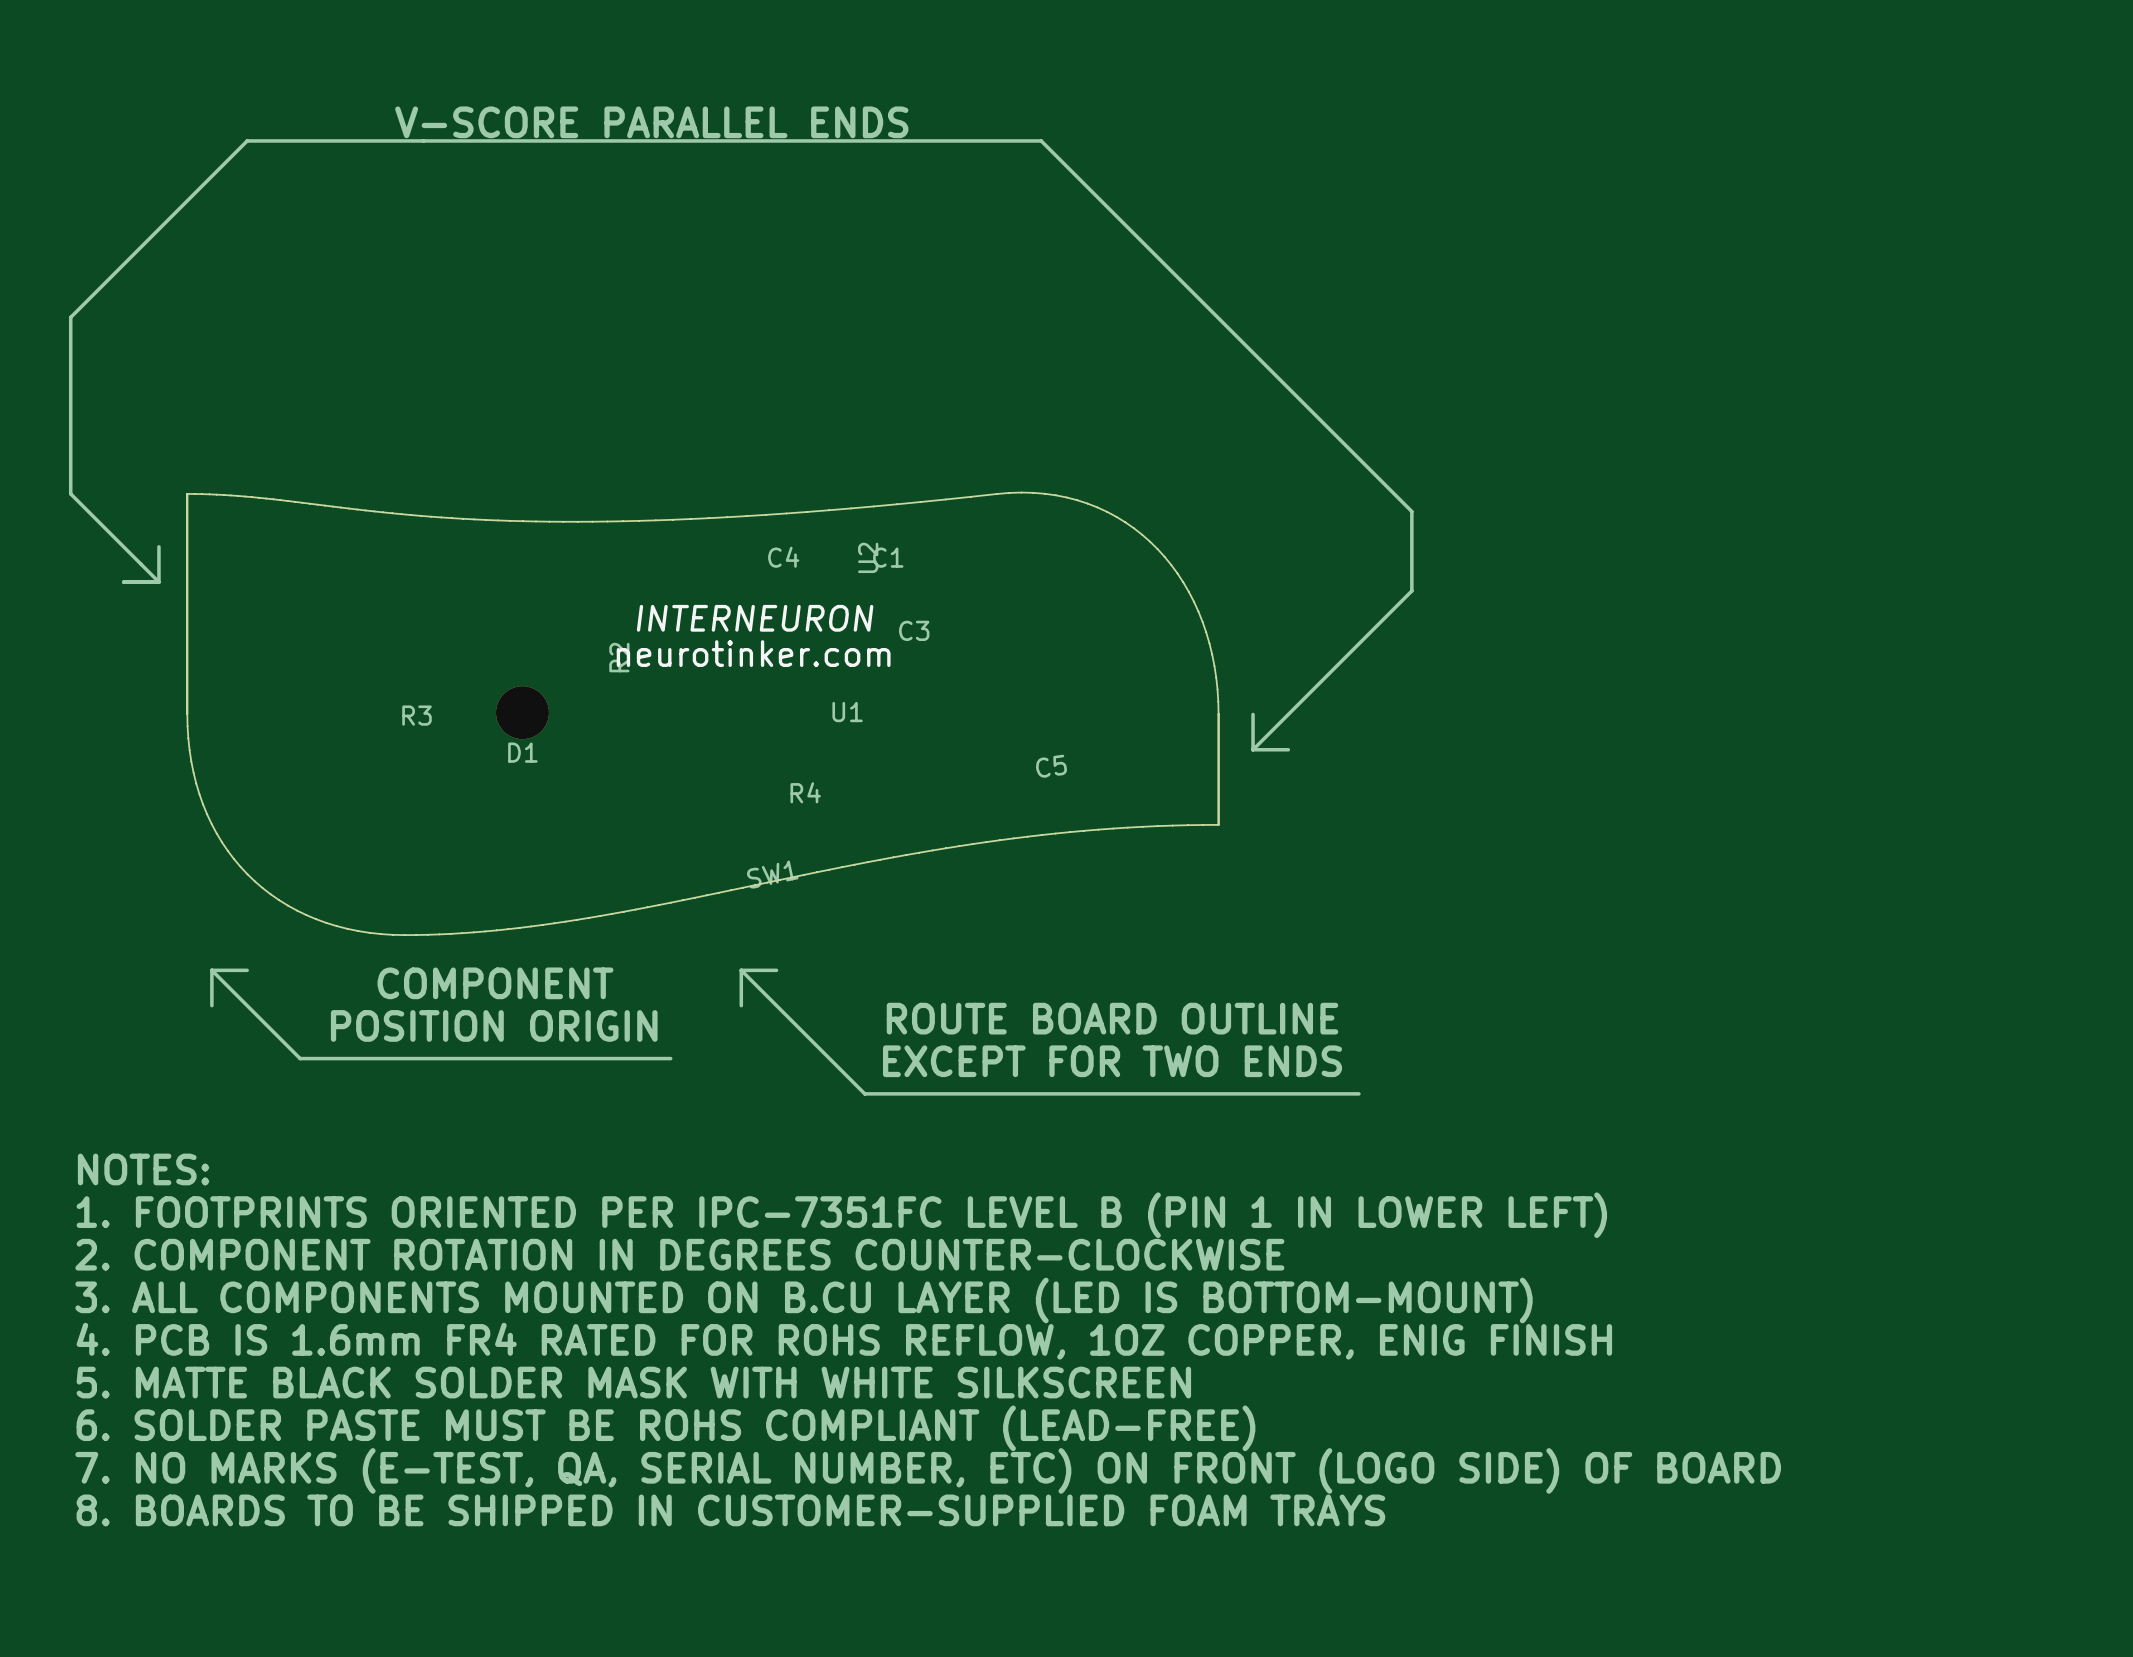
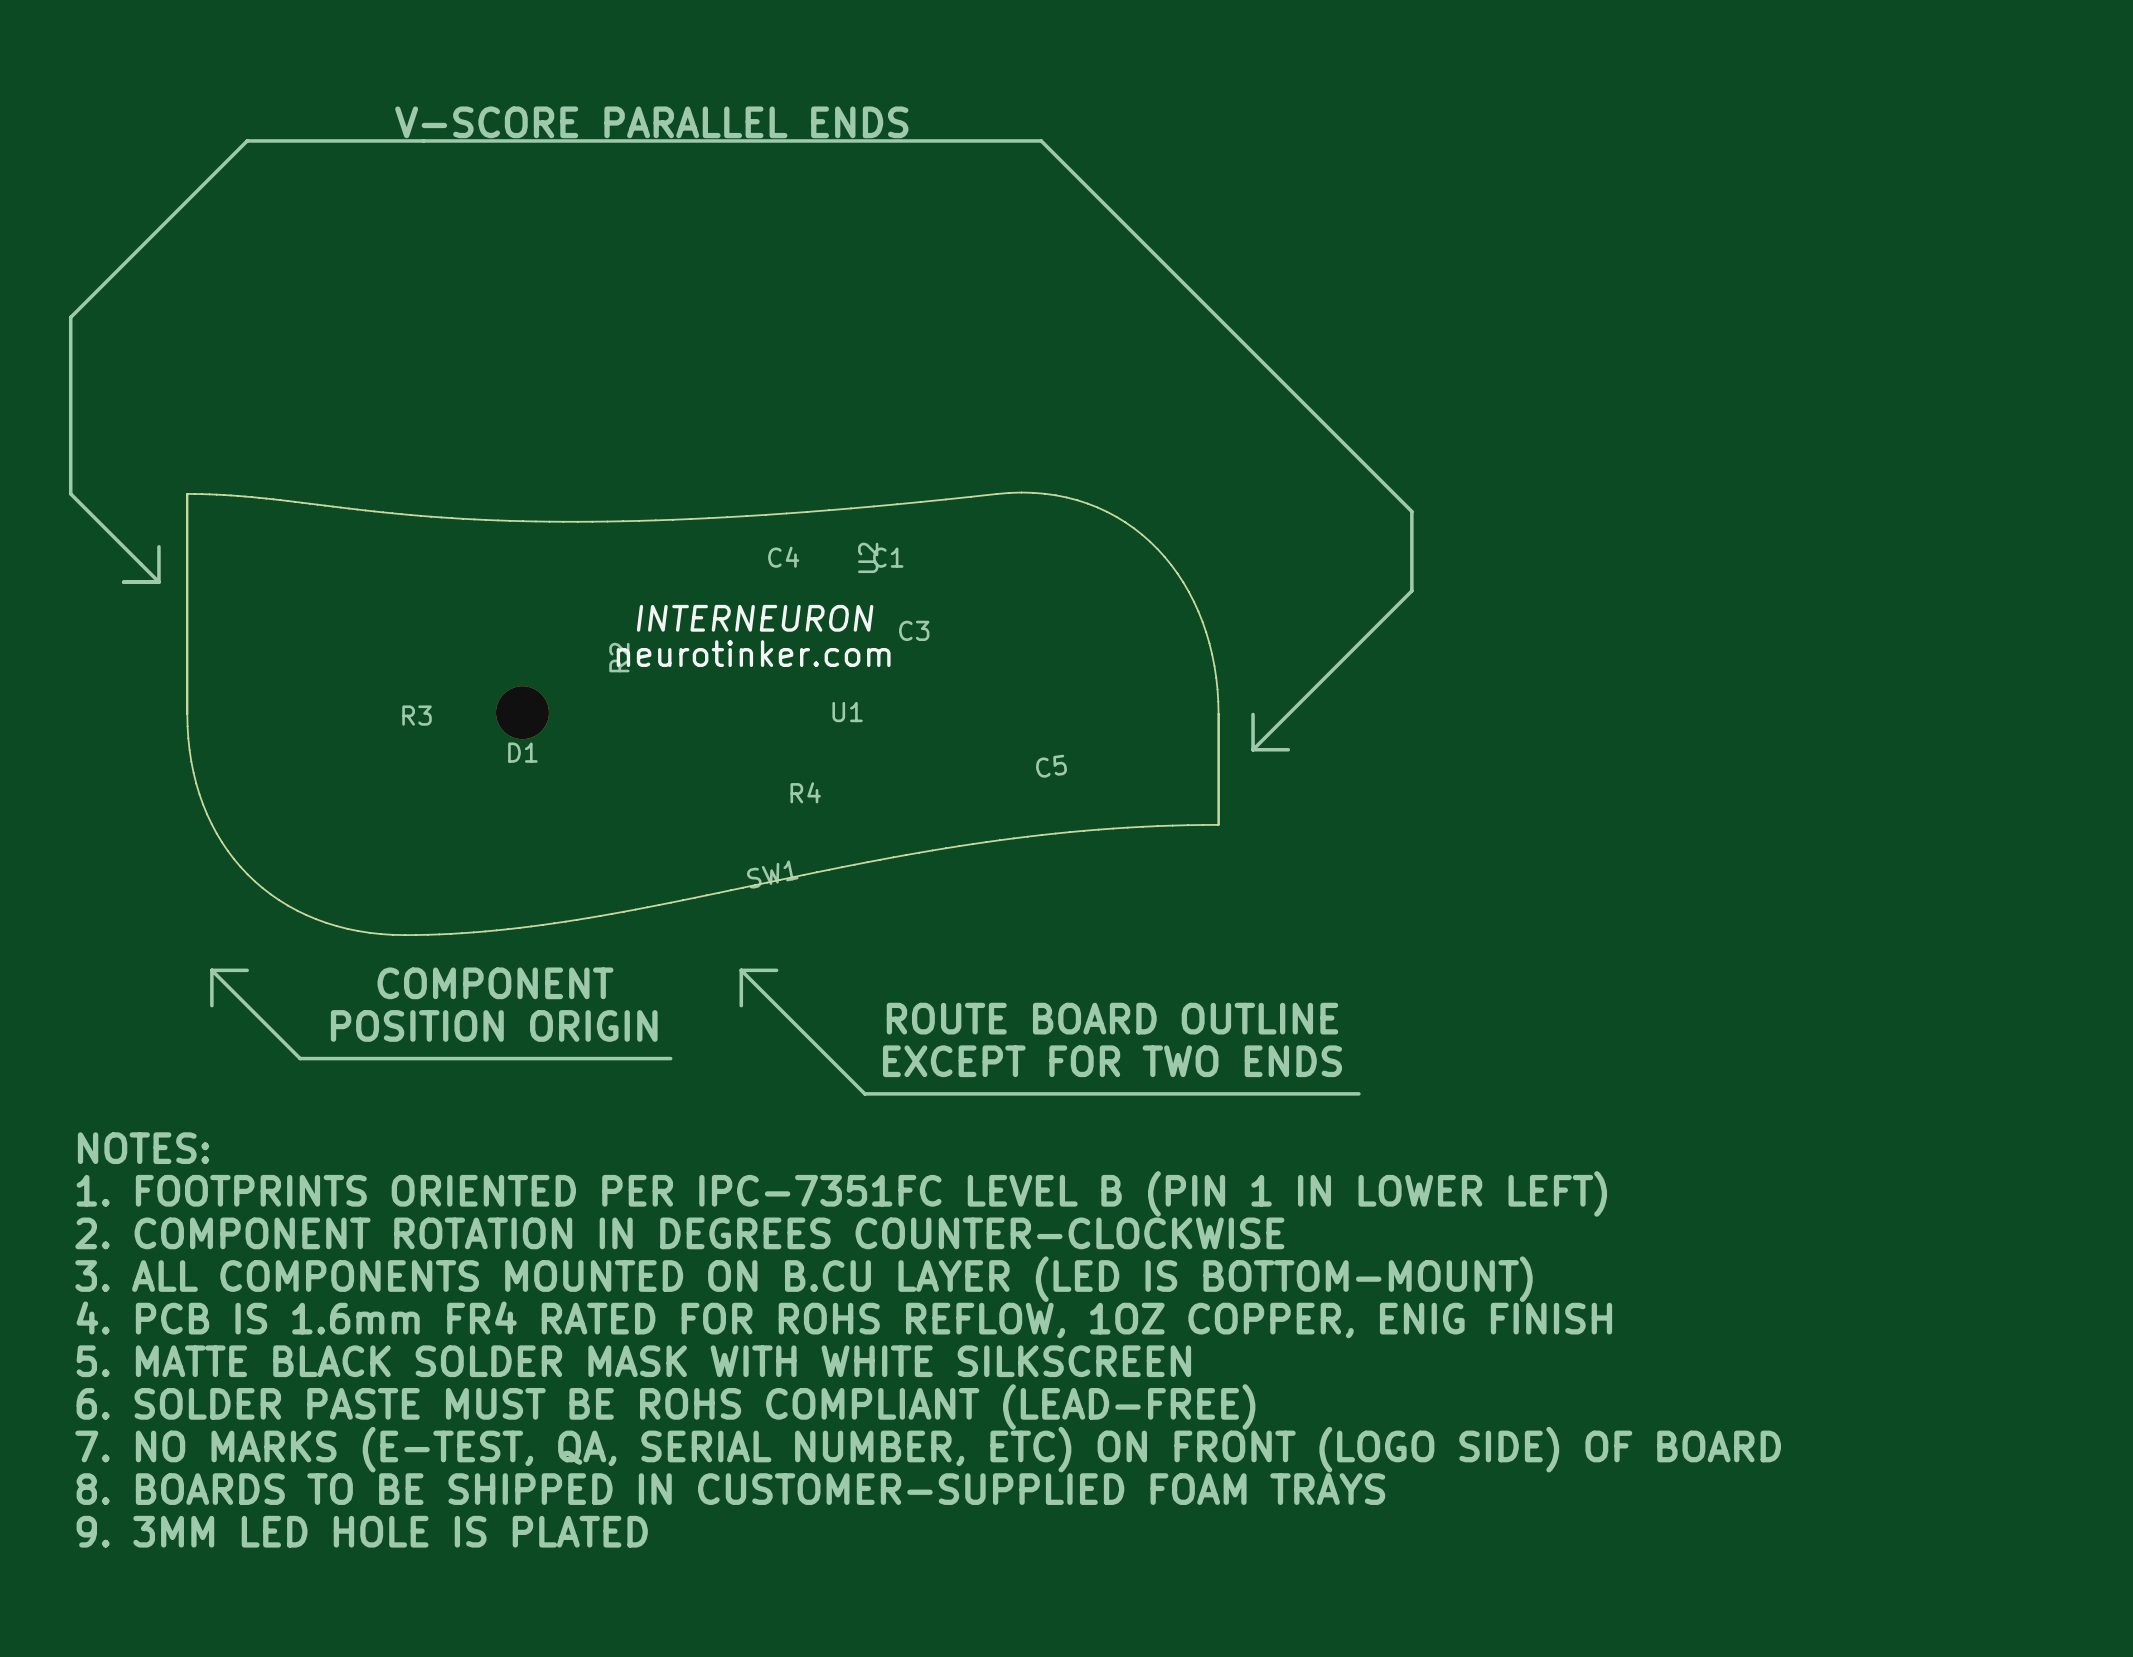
text position: NOTES: (143, 1169) -> NOTES: (143, 1148)
text position: 1. FOOTPRINTS ORIENTED PER IPC-7351FC LEVEL B (PIN 1 IN LOWER LEFT) (841, 1215) -> 1. FOOTPRINTS ORIENTED PER IPC-7351FC LEVEL B (PIN 1 IN LOWER LEFT) (841, 1193)
text position: 2. COMPONENT ROTATION IN DEGREES COUNTER-CLOCKWISE (679, 1254) -> 2. COMPONENT ROTATION IN DEGREES COUNTER-CLOCKWISE (679, 1233)
text position: 3. ALL COMPONENTS MOUNTED ON B.CU LAYER (LED IS BOTTOM-MOUNT) (804, 1300) -> 3. ALL COMPONENTS MOUNTED ON B.CU LAYER (LED IS BOTTOM-MOUNT) (804, 1279)
text position: 4. PCB IS 1.6mm FR4 RATED FOR ROHS REFLOW, 1OZ COPPER, ENIG FINISH (844, 1341) -> 4. PCB IS 1.6mm FR4 RATED FOR ROHS REFLOW, 1OZ COPPER, ENIG FINISH (844, 1319)
text position: 5. MATTE BLACK SOLDER MASK WITH WHITE SILKSCREEN (633, 1382) -> 5. MATTE BLACK SOLDER MASK WITH WHITE SILKSCREEN (633, 1361)
text position: 6. SOLDER PASTE MUST BE ROHS COMPLIANT (LEAD-FREE) (665, 1428) -> 6. SOLDER PASTE MUST BE ROHS COMPLIANT (LEAD-FREE) (665, 1407)
text position: 7. NO MARKS (E-TEST, QA, SERIAL NUMBER, ETC) ON FRONT (LOGO SIDE) OF BOARD (928, 1470) -> 7. NO MARKS (E-TEST, QA, SERIAL NUMBER, ETC) ON FRONT (LOGO SIDE) OF BOARD (928, 1449)
text position: 8. BOARDS TO BE SHIPPED IN CUSTOMER-SUPPLIED FOAM TRAYS (730, 1510) -> 8. BOARDS TO BE SHIPPED IN CUSTOMER-SUPPLIED FOAM TRAYS (730, 1489)
text: none -> 9. 3MM LED HOLE IS PLATED (362, 1531)

